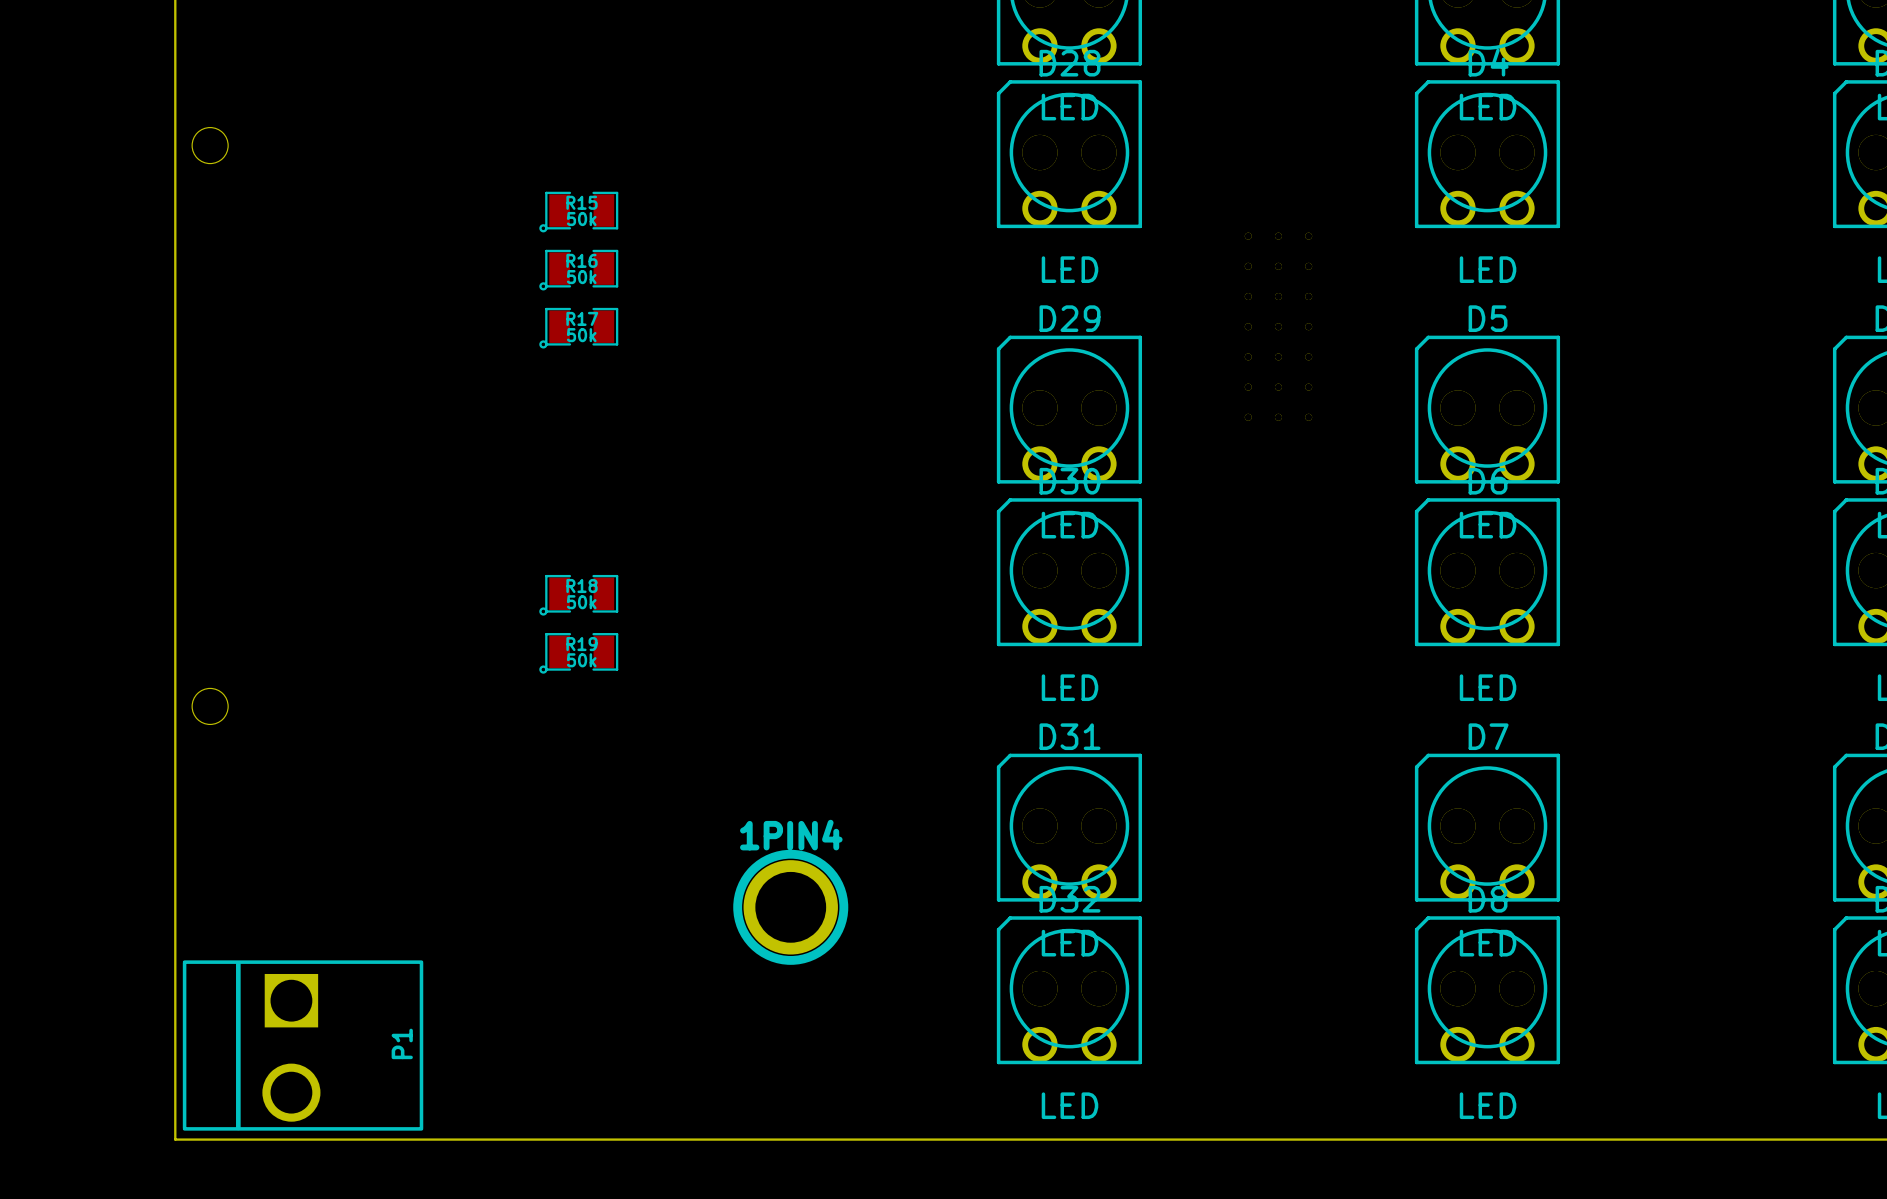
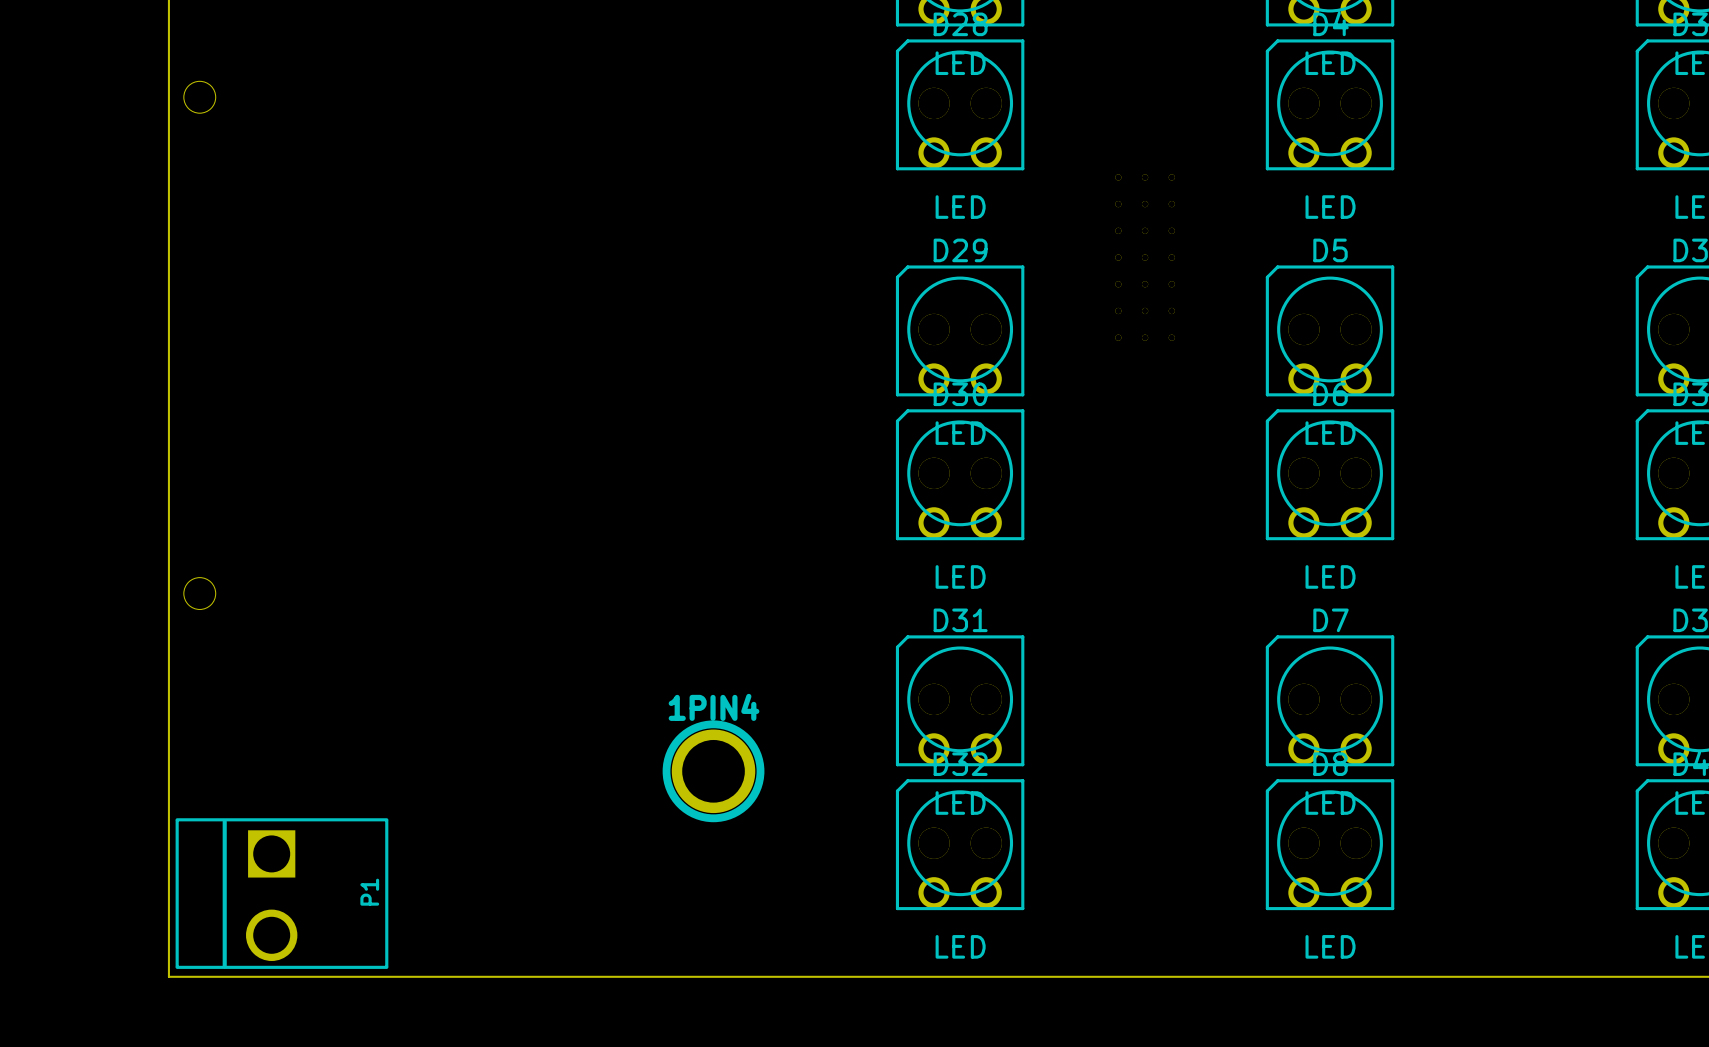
R15: 50k (578, 212) -> none
R16: 50k (578, 270) -> none
R17: 50k (578, 328) -> none
R18: 50k (578, 595) -> none
R19: 50k (578, 653) -> none

